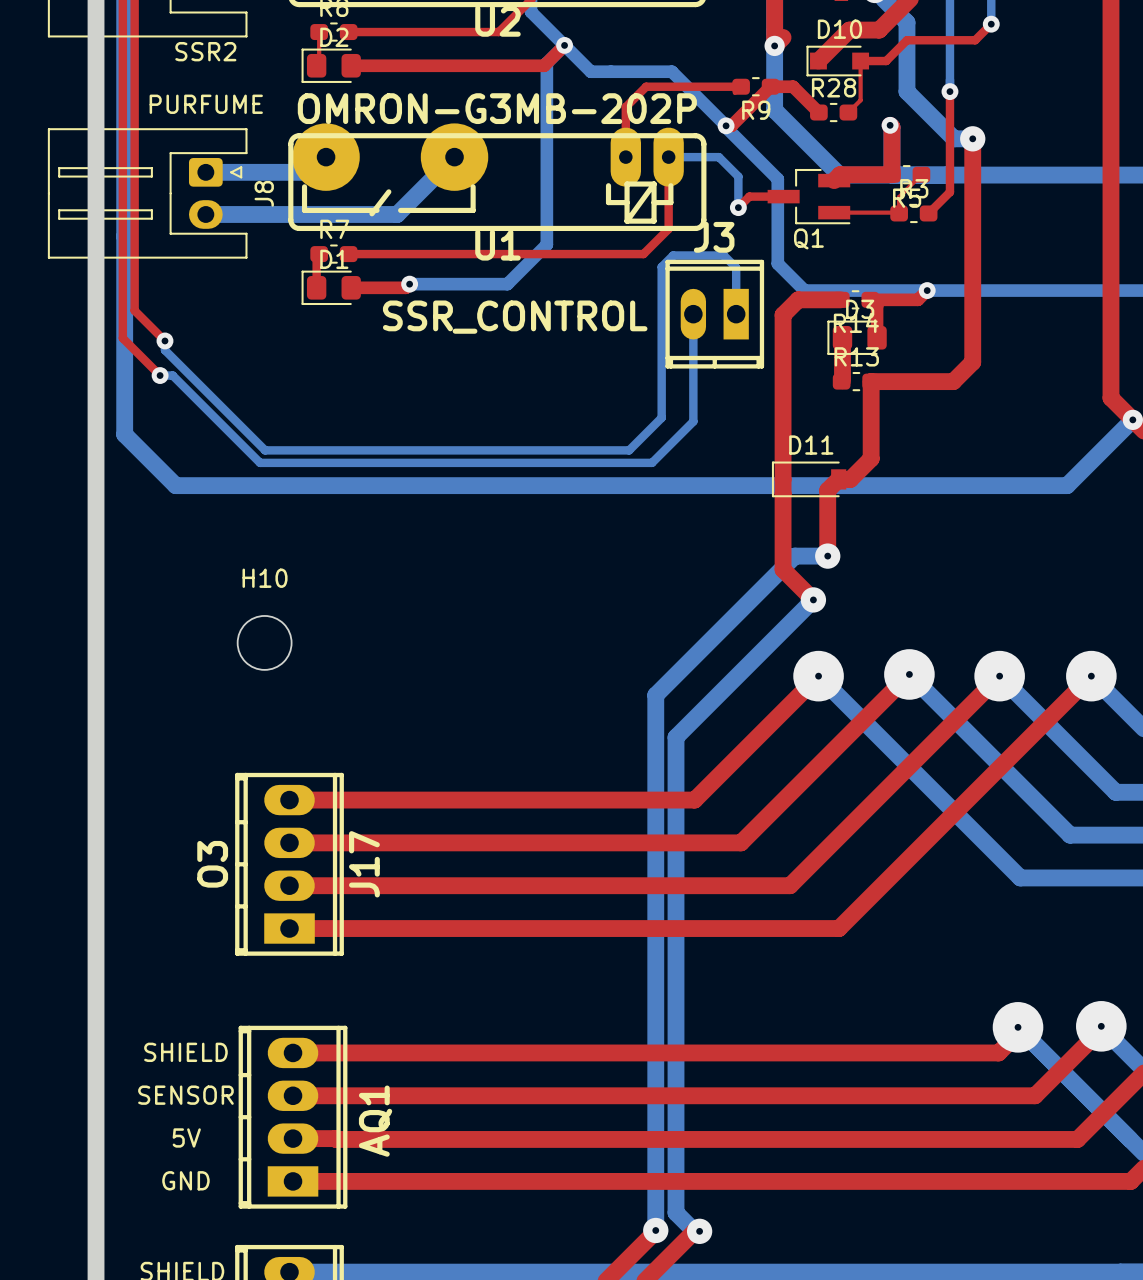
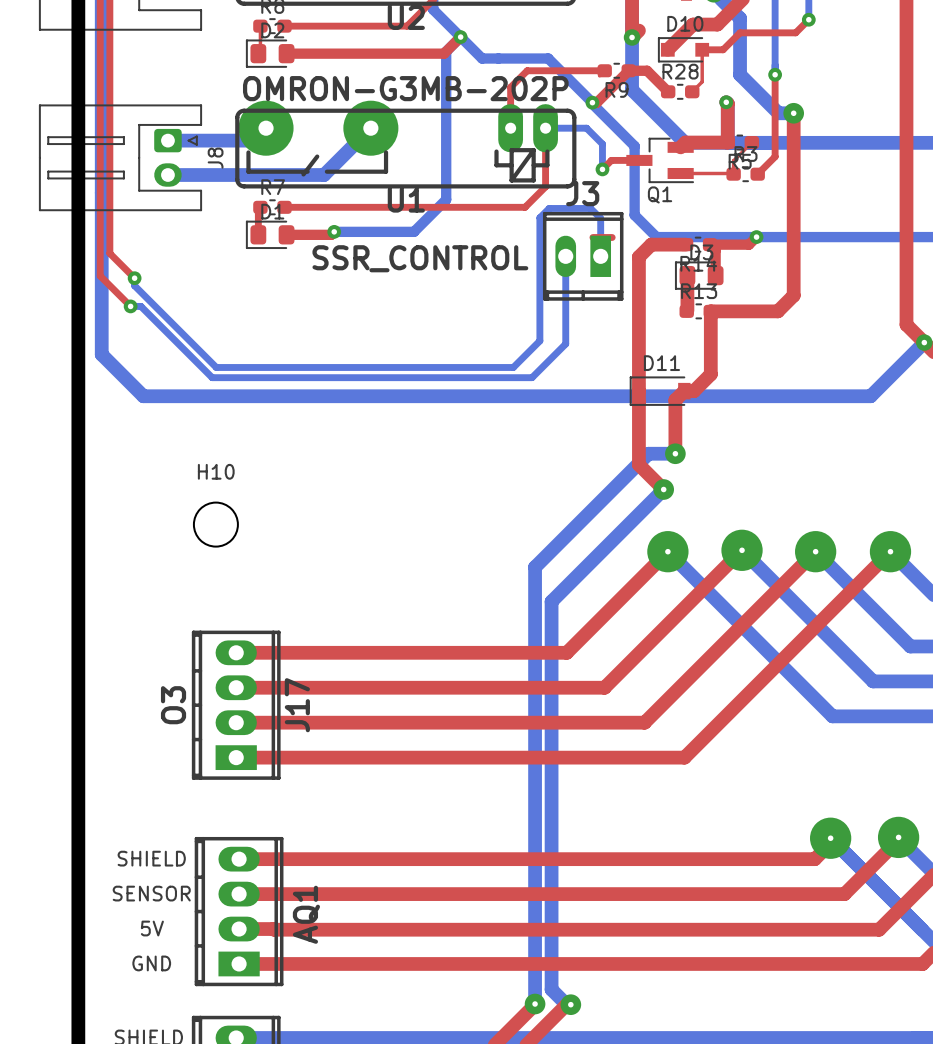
part value: SSR2 (205, 51) -> none
J8 value: PURFUME (206, 104) -> none
top track: none -> (592, 237) (612, 237)

